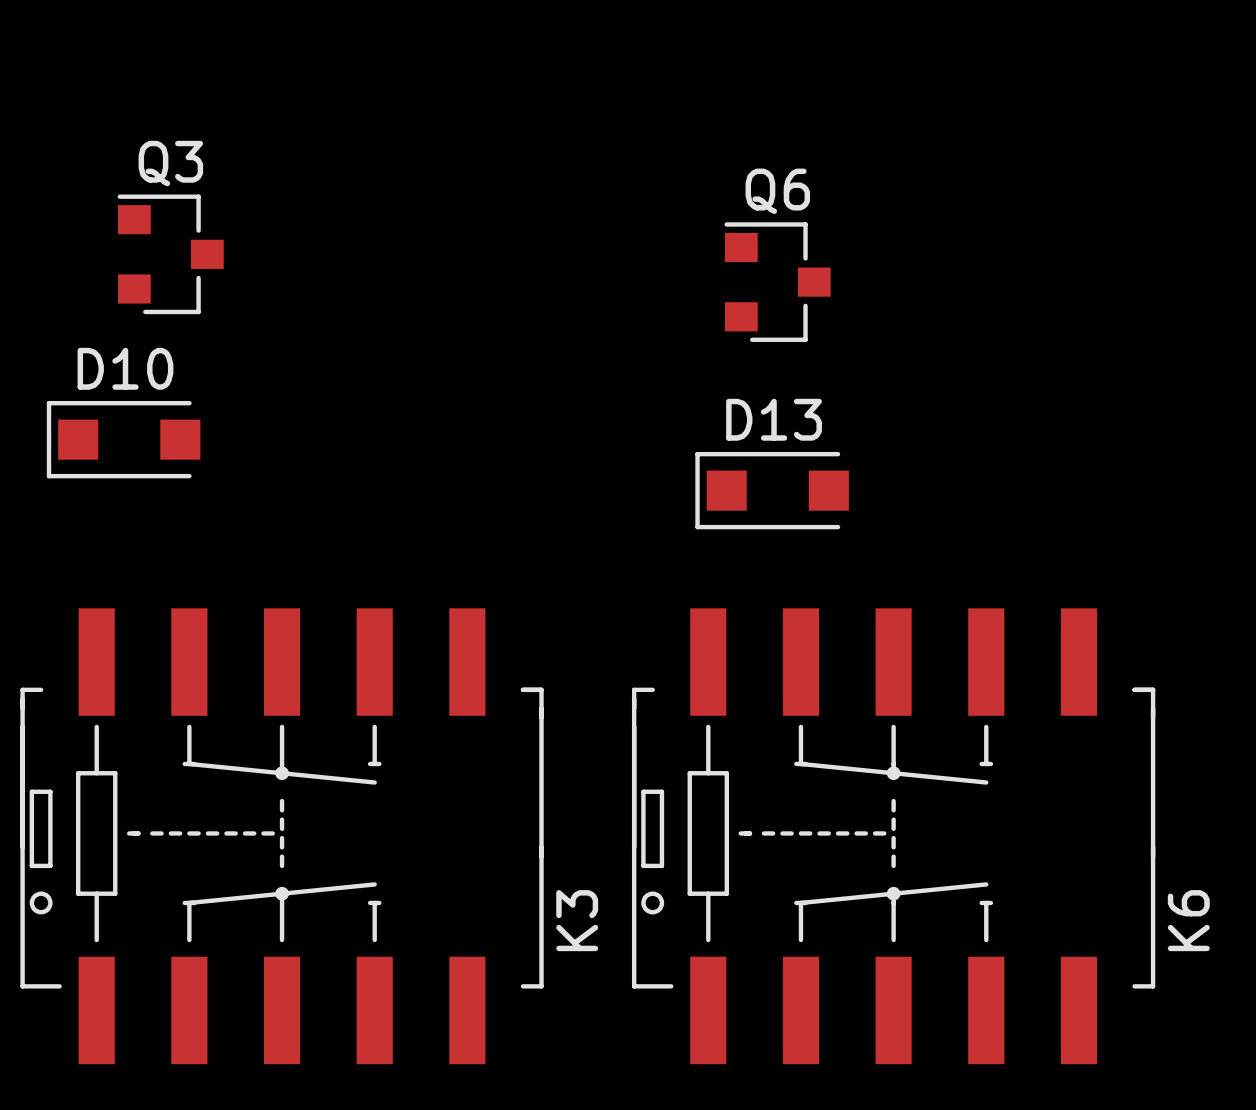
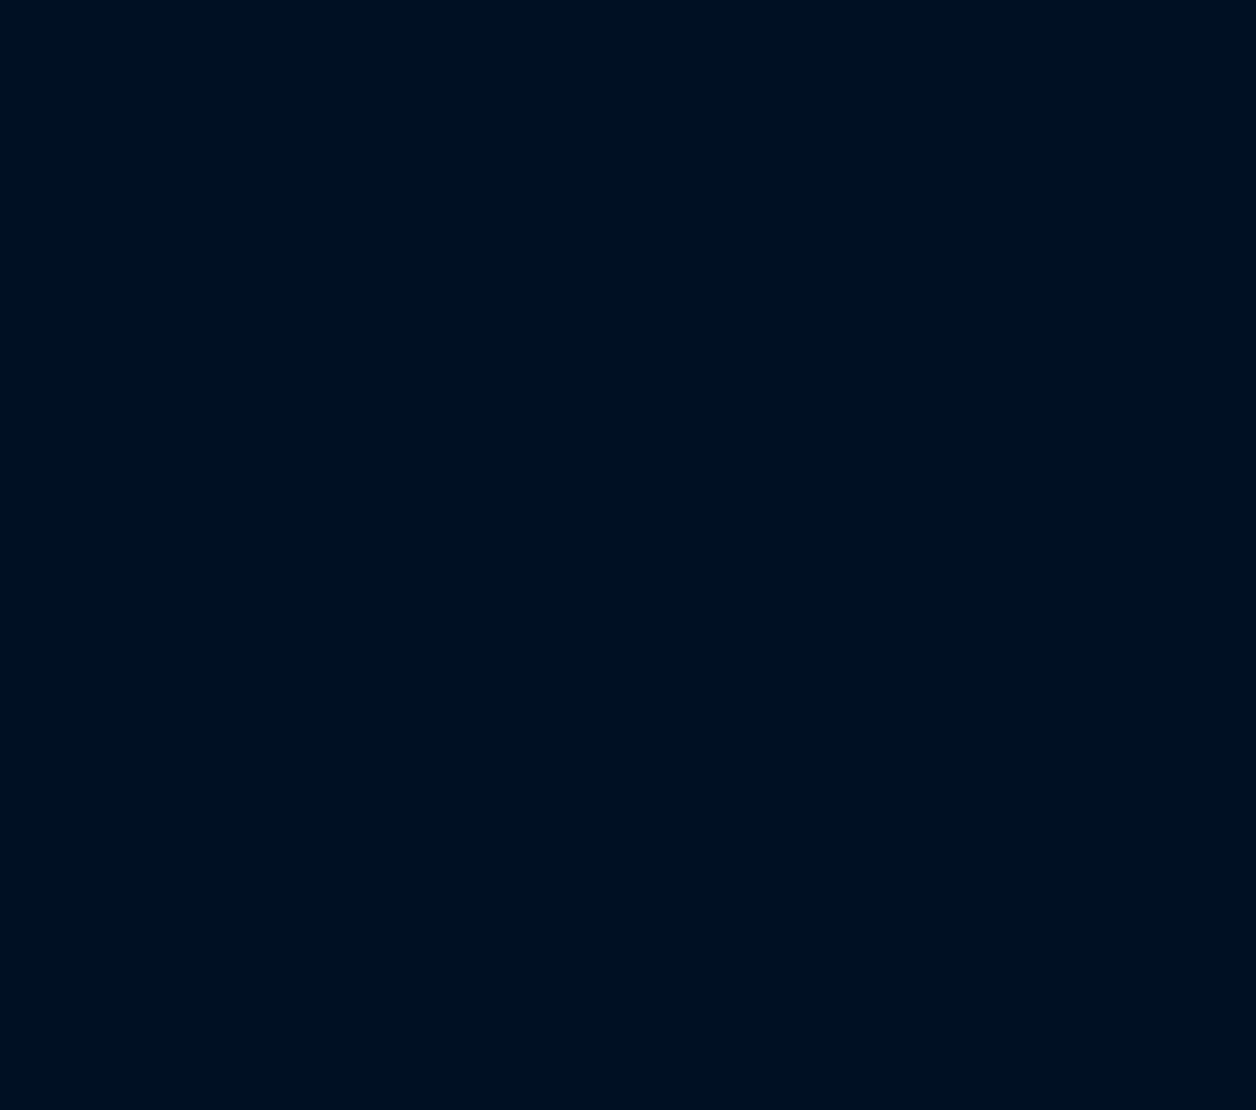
Q3: (170, 254) -> none
Q6: (777, 282) -> none
D10: (123, 439) -> none
D13: (772, 490) -> none
K3: (282, 836) -> none
K6: (893, 836) -> none

